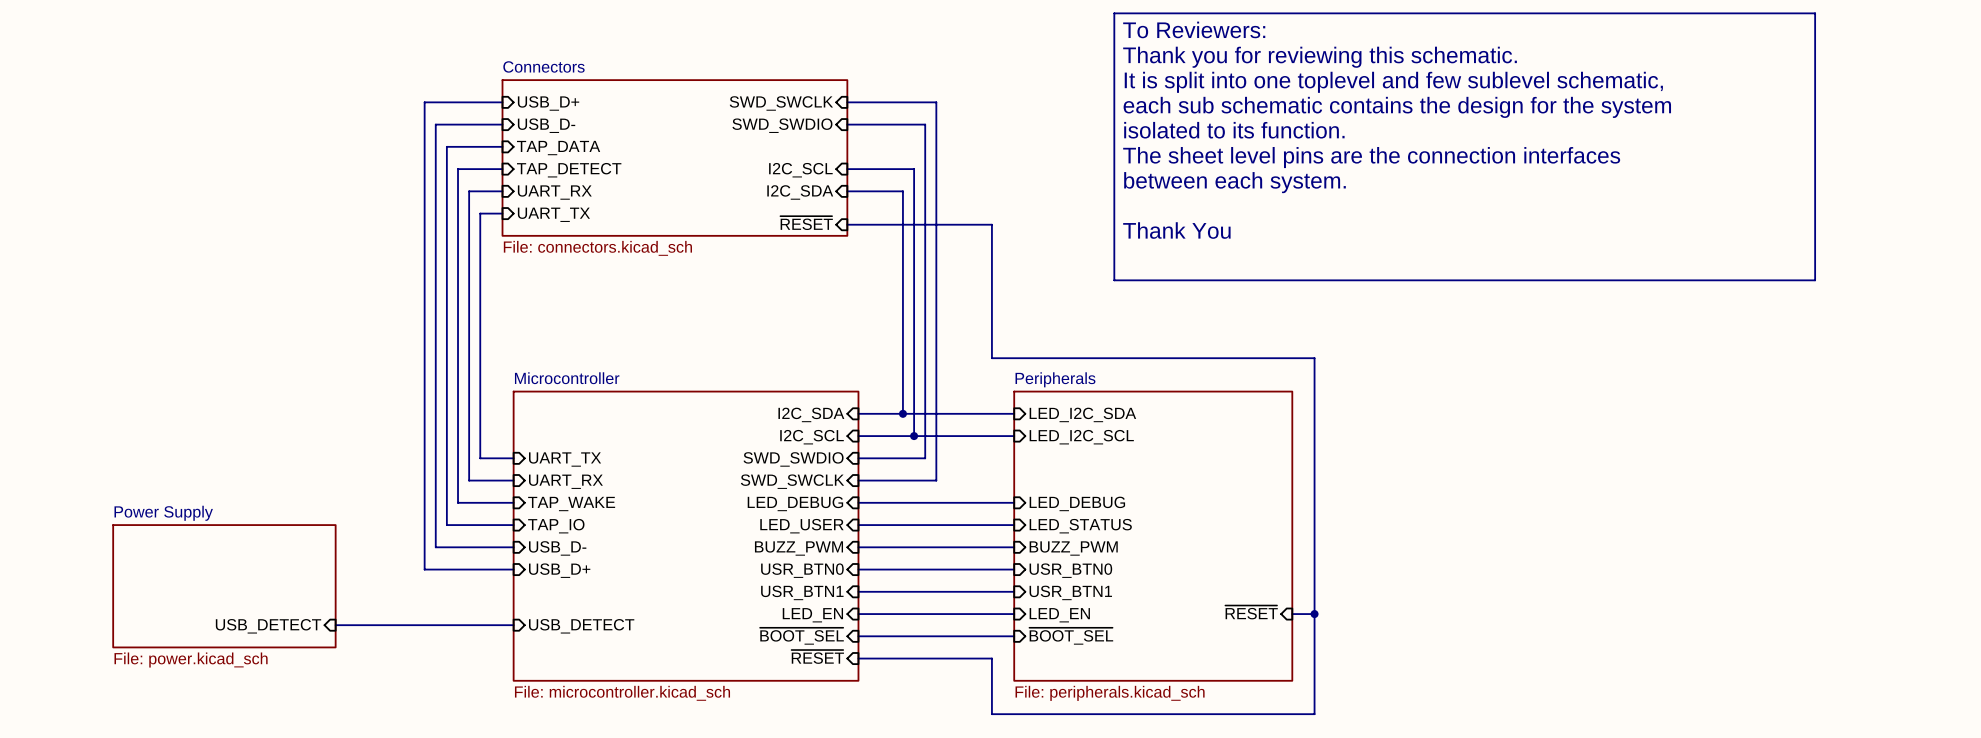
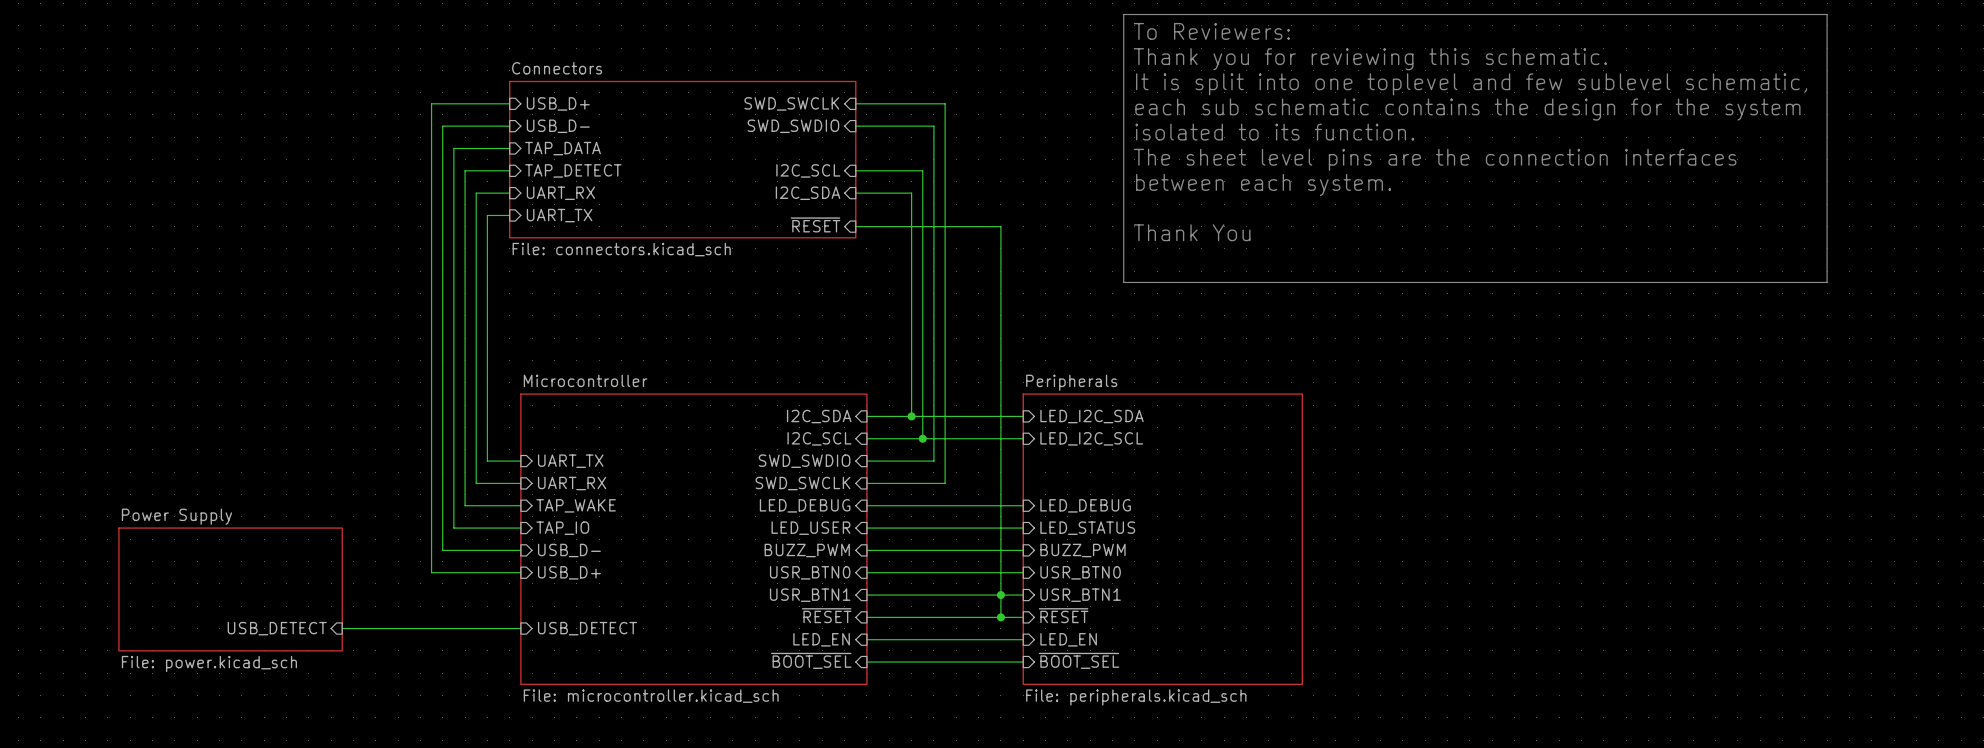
wire: (991, 358) (1314, 358) (1314, 714) (991, 714) (991, 658) -> (1000, 360) (1000, 617)
junction: none -> (1000, 595)
sheet pin: ~{RESET} (1251, 612) -> none
junction: none -> (1000, 617)
wire: (1292, 614) (1314, 614) -> none
junction: (1314, 614) -> none
sheet pin: LED_EN (812, 615) -> ~{RESET} (826, 615)
sheet pin: LED_EN (1059, 615) -> ~{RESET} (1063, 615)
sheet pin: ~{BOOT_SEL} (801, 636) -> LED_EN (821, 639)
sheet pin: ~{BOOT_SEL} (1071, 636) -> LED_EN (1068, 639)
sheet pin: ~{RESET} (817, 656) -> ~{BOOT_SEL} (811, 660)
wire: none -> (1000, 662) (1023, 662)
sheet pin: none -> ~{BOOT_SEL} (1079, 660)

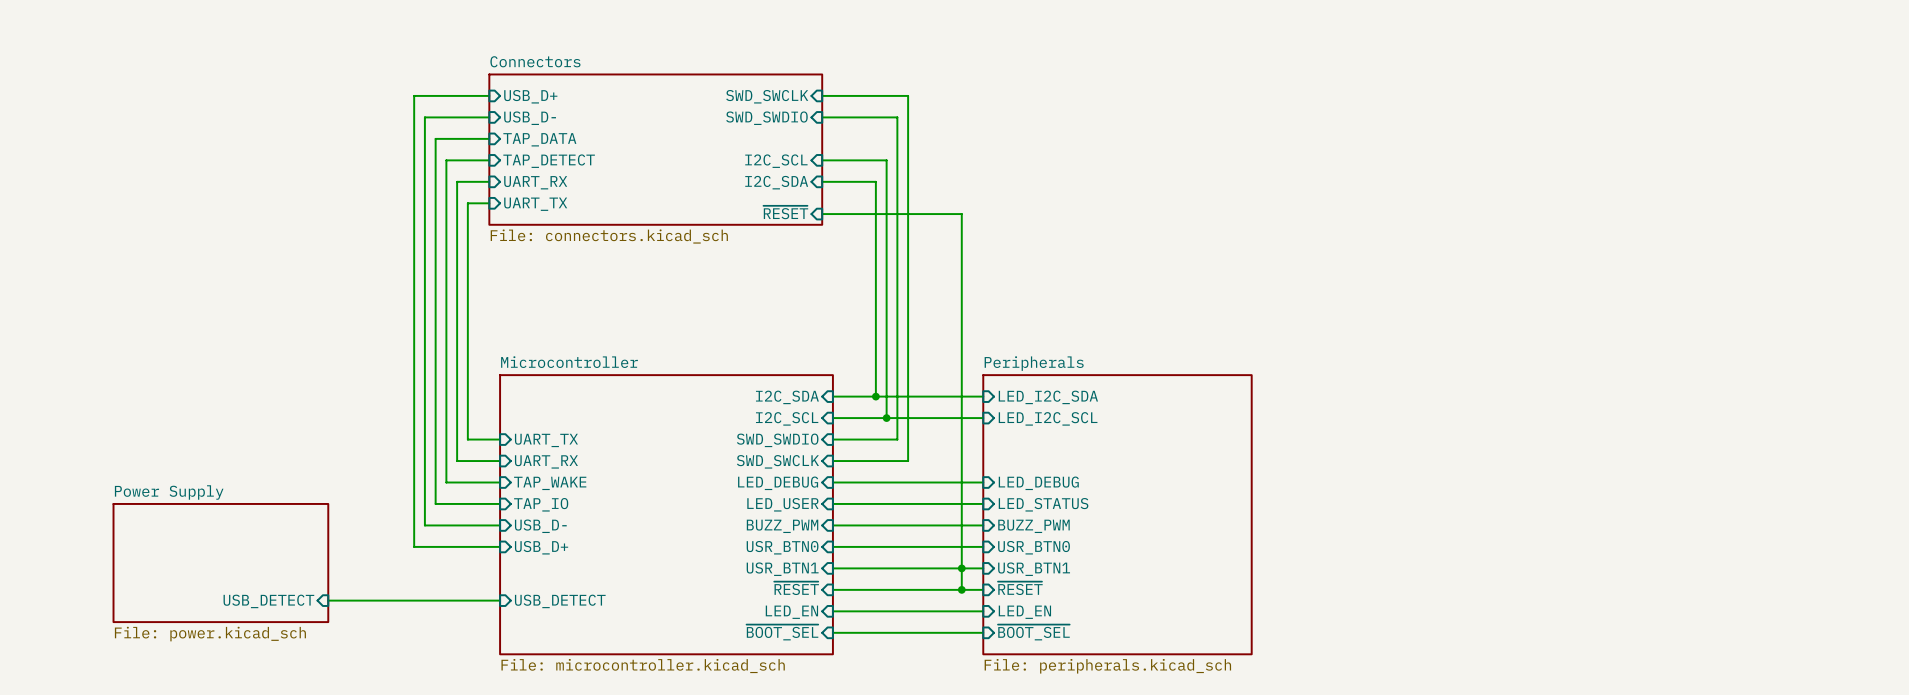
line: (1123, 14) (1827, 14) (1827, 282) (1123, 282) (1123, 14) -> none
text: To Reviewers: (1211, 31) -> none
text: Thank you for reviewing this schematic. (1370, 59) -> none
text: It is split into one toplevel and few sublevel schematic, (1471, 84) -> none
text: each sub schematic contains the design for the system (1467, 109) -> none
text: isolated to its function. (1274, 132) -> none
text: The sheet level pins are the connection interfaces (1435, 159) -> none
text: between each system. (1263, 185) -> none
text: Thank You (1192, 232) -> none

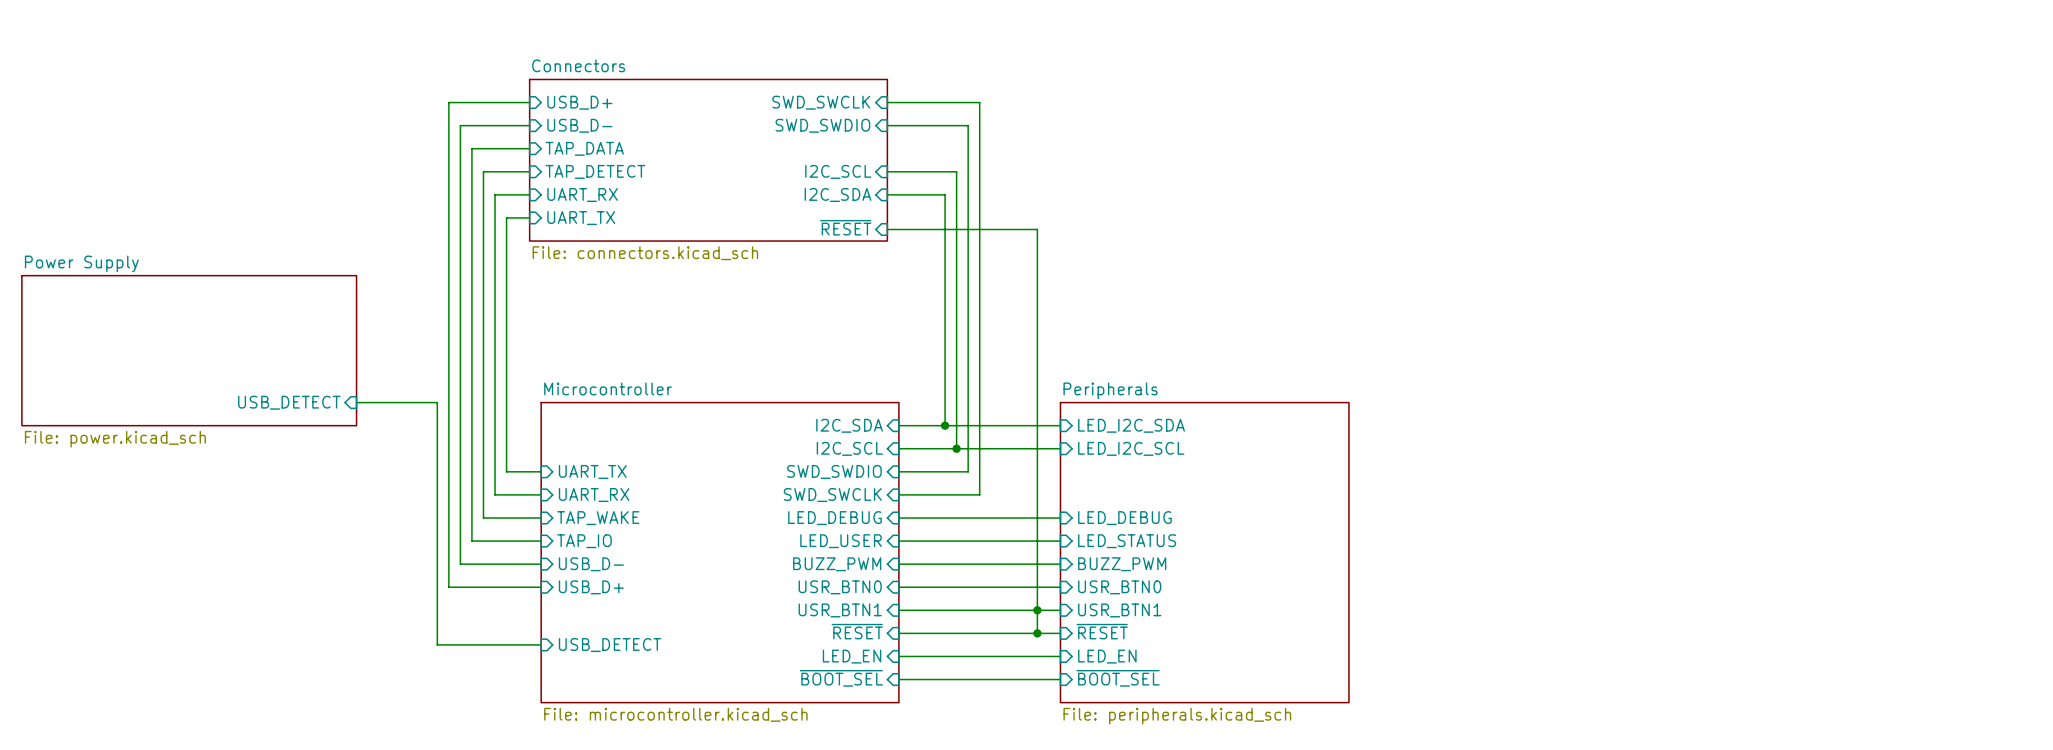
sheet Power Supply: none -> File: power.kicad_sch (189, 350)
sheet pin: none -> USB_DETECT (289, 402)
sheet Power Supply: File: power.kicad_sch (220, 563) -> none
wire: (328, 600) (403, 600) -> (356, 402) (437, 402) (437, 644)
sheet pin: USB_DETECT (268, 601) -> none

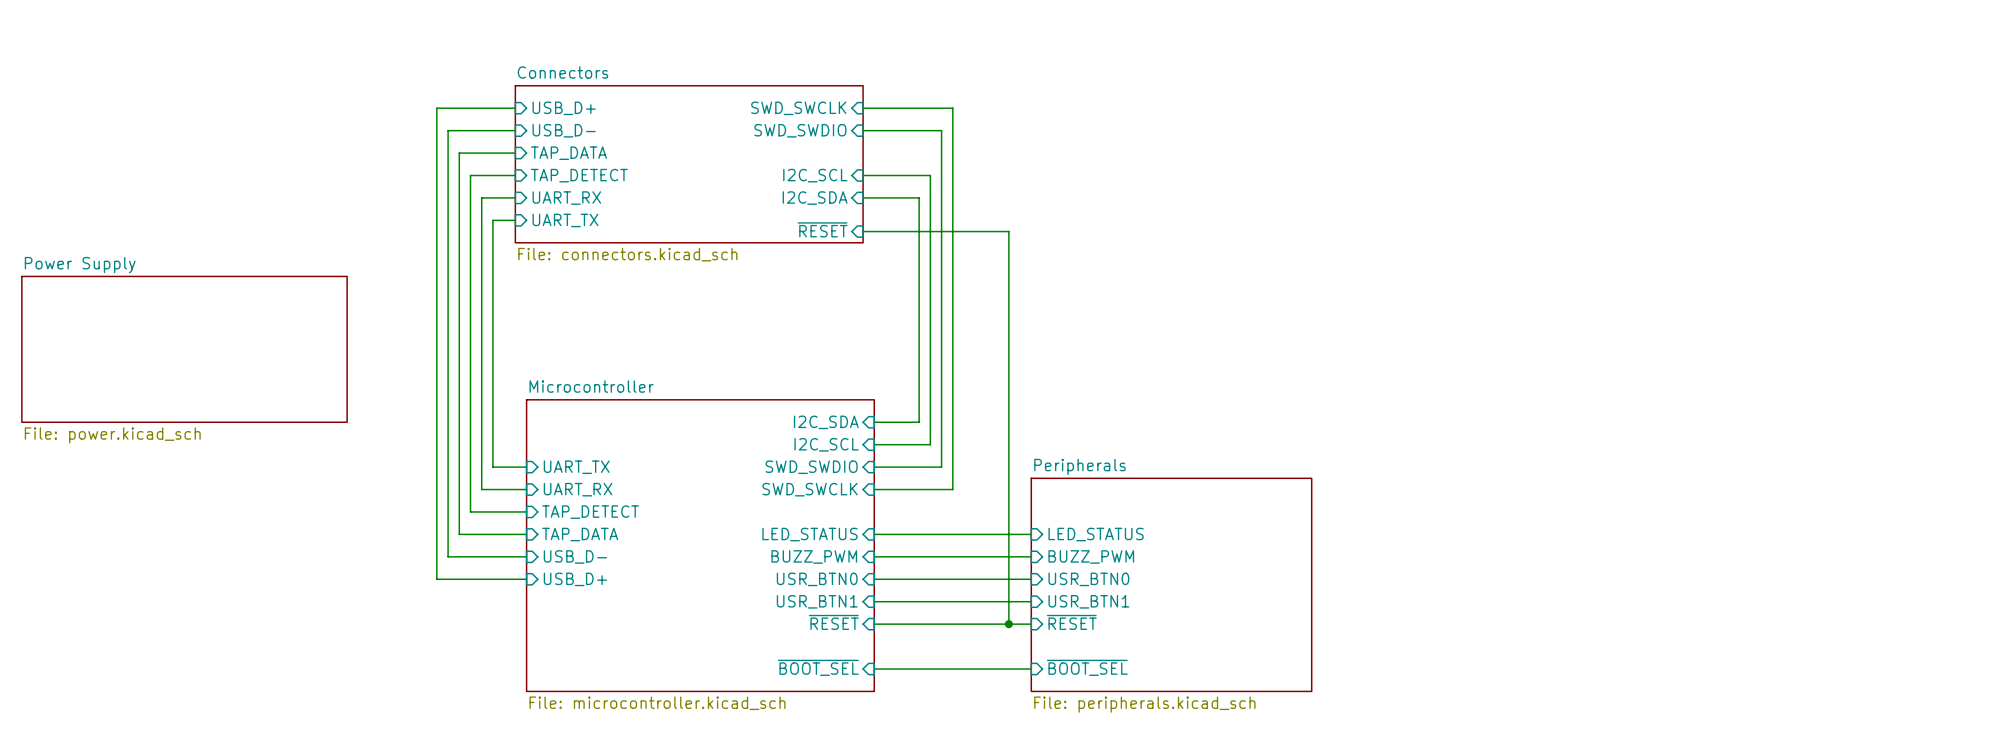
sheet pin: USB_DETECT (289, 402) -> none
wire: (356, 402) (437, 402) (437, 644) (541, 644) -> none
wire: (945, 425) (1060, 425) -> none
junction: (945, 425) -> none
sheet pin: LED_I2C_SDA (1131, 425) -> none
wire: (956, 448) (1060, 448) -> none
junction: (956, 448) -> none
sheet pin: LED_I2C_SCL (1131, 448) -> none
wire: (898, 517) (1060, 517) -> none
sheet pin: TAP_WAKE (598, 518) -> TAP_DETECT (590, 512)
sheet pin: LED_DEBUG (834, 518) -> none
sheet pin: LED_DEBUG (1124, 518) -> none
sheet pin: TAP_IO (584, 541) -> TAP_DATA (580, 534)
sheet pin: LED_USER (841, 541) -> LED_STATUS (810, 534)
sheet Peripherals: File: peripherals.kicad_sch (1204, 552) -> none
sheet Peripherals: none -> File: peripherals.kicad_sch (1171, 584)
junction: (1037, 610) -> none
sheet pin: USB_DETECT (610, 645) -> none
sheet pin: LED_EN (852, 656) -> none
wire: (898, 656) (1060, 656) -> none
sheet pin: LED_EN (1107, 656) -> none

